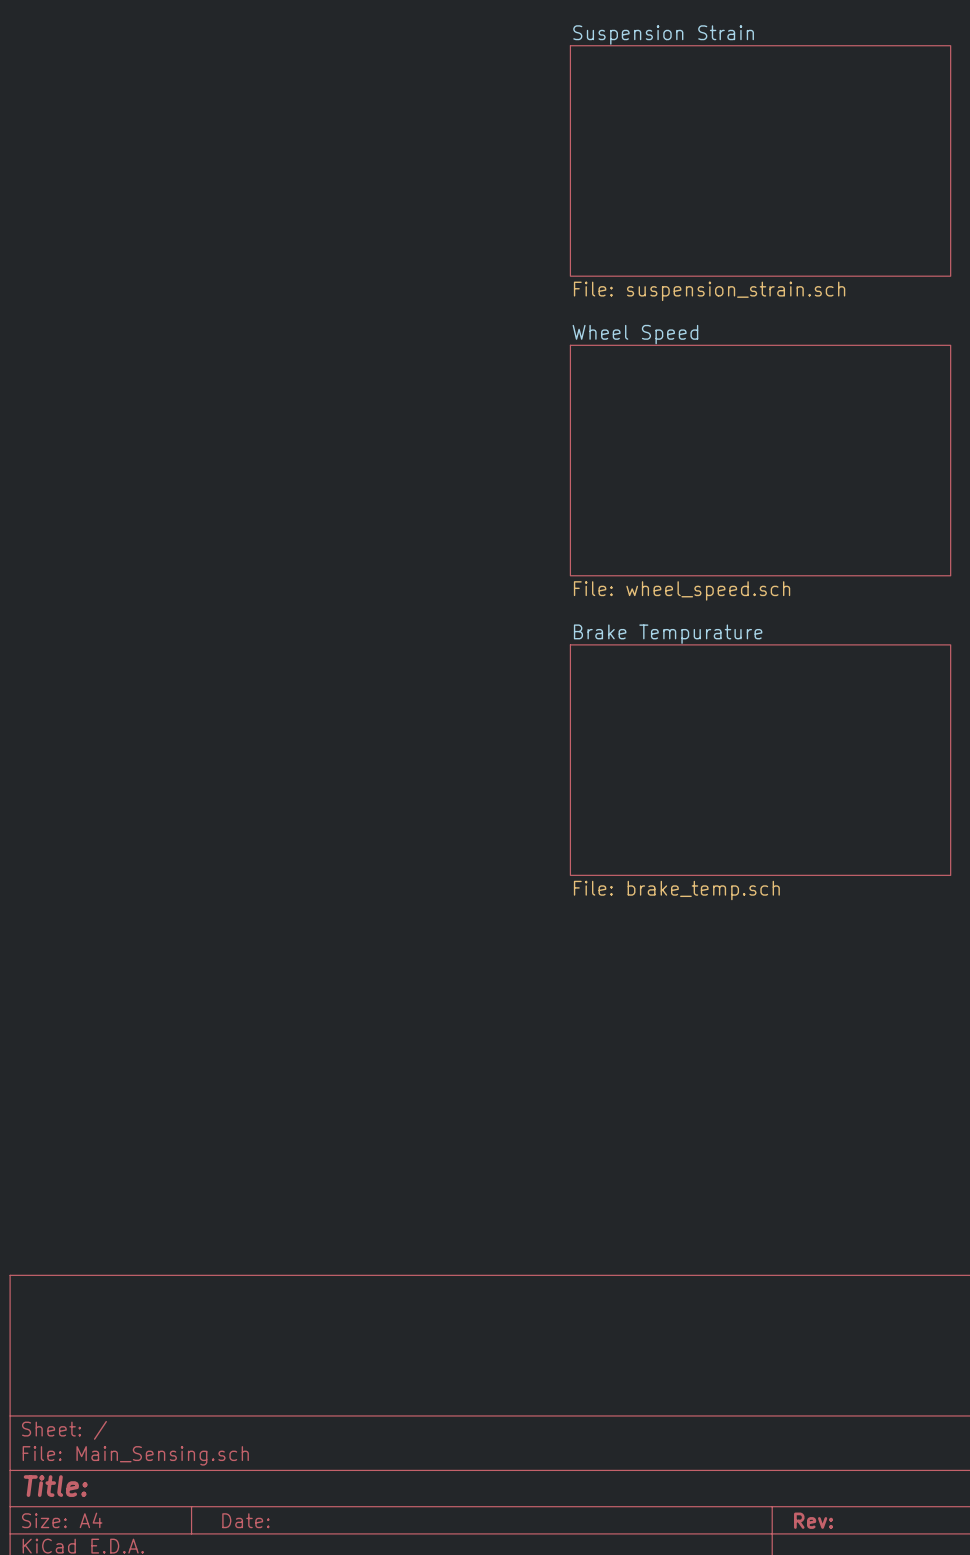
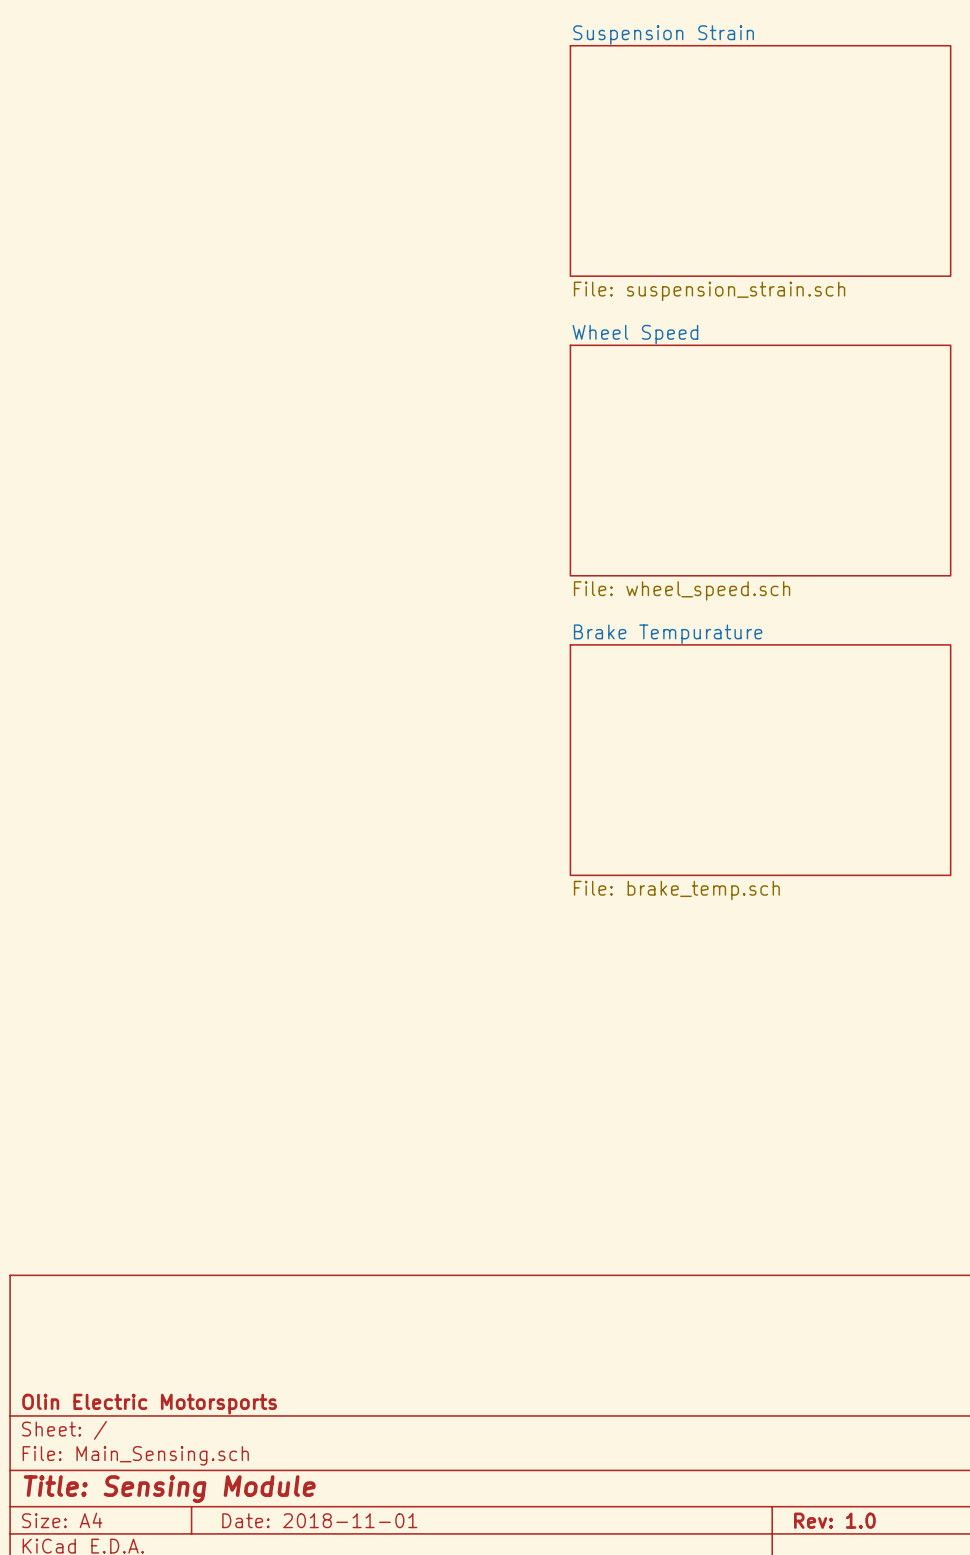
title block: none -> Olin Electric Motorsports (149, 1404)
title block: Title: (55, 1486) -> Title: Sensing Module (169, 1489)
title block: Date: (245, 1520) -> Date: 2018-11-01 (319, 1520)
title block: Rev: (813, 1520) -> Rev: 1.0 (834, 1520)

